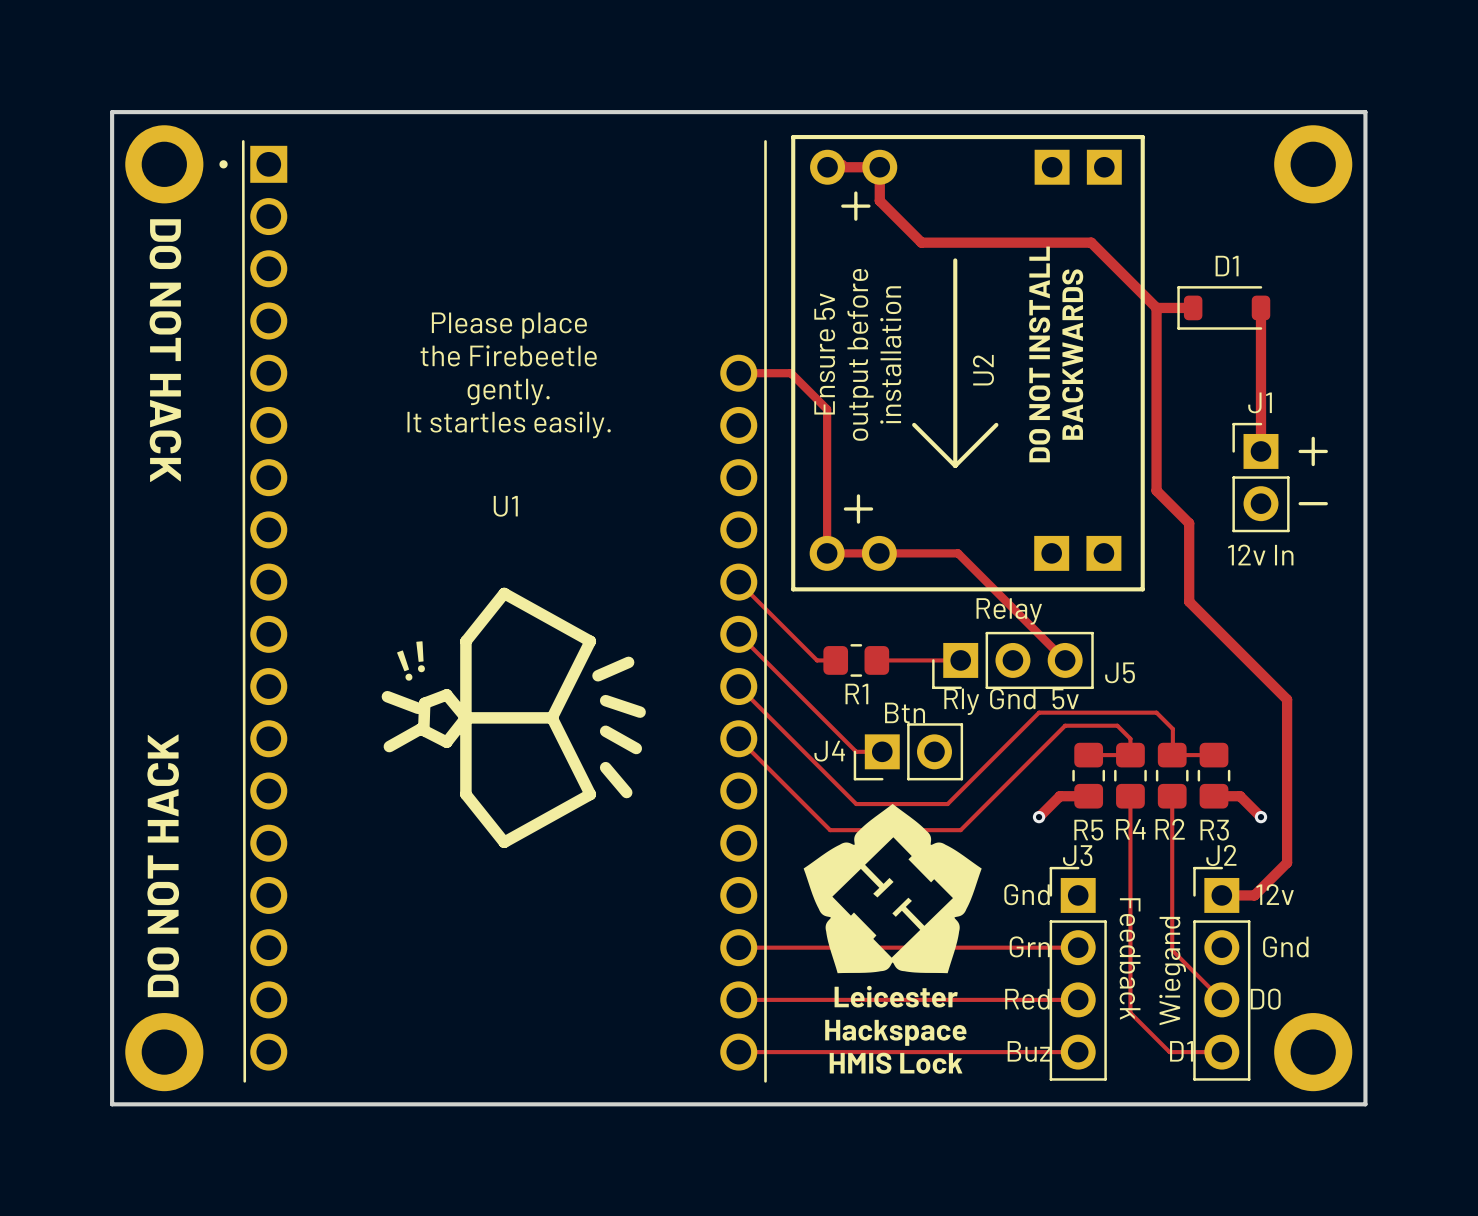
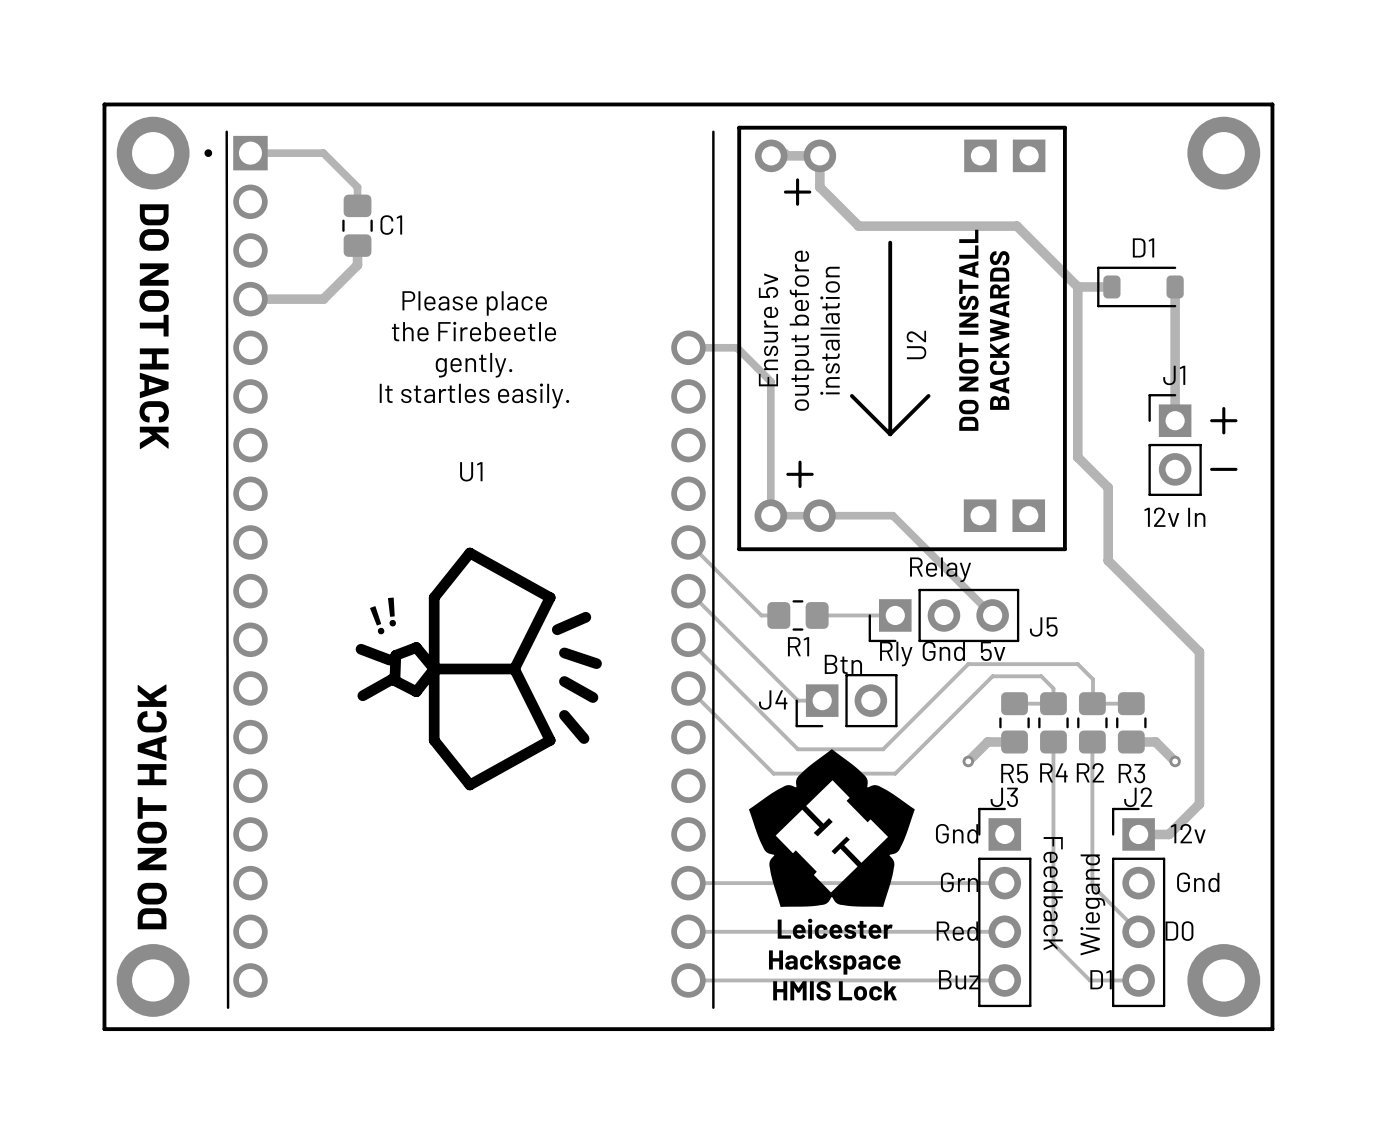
track: none -> (250, 153) (323, 153) (357, 187) (357, 205)
C1: none -> (357, 225)
track: none -> (357, 245) (357, 265) (323, 299) (250, 299)

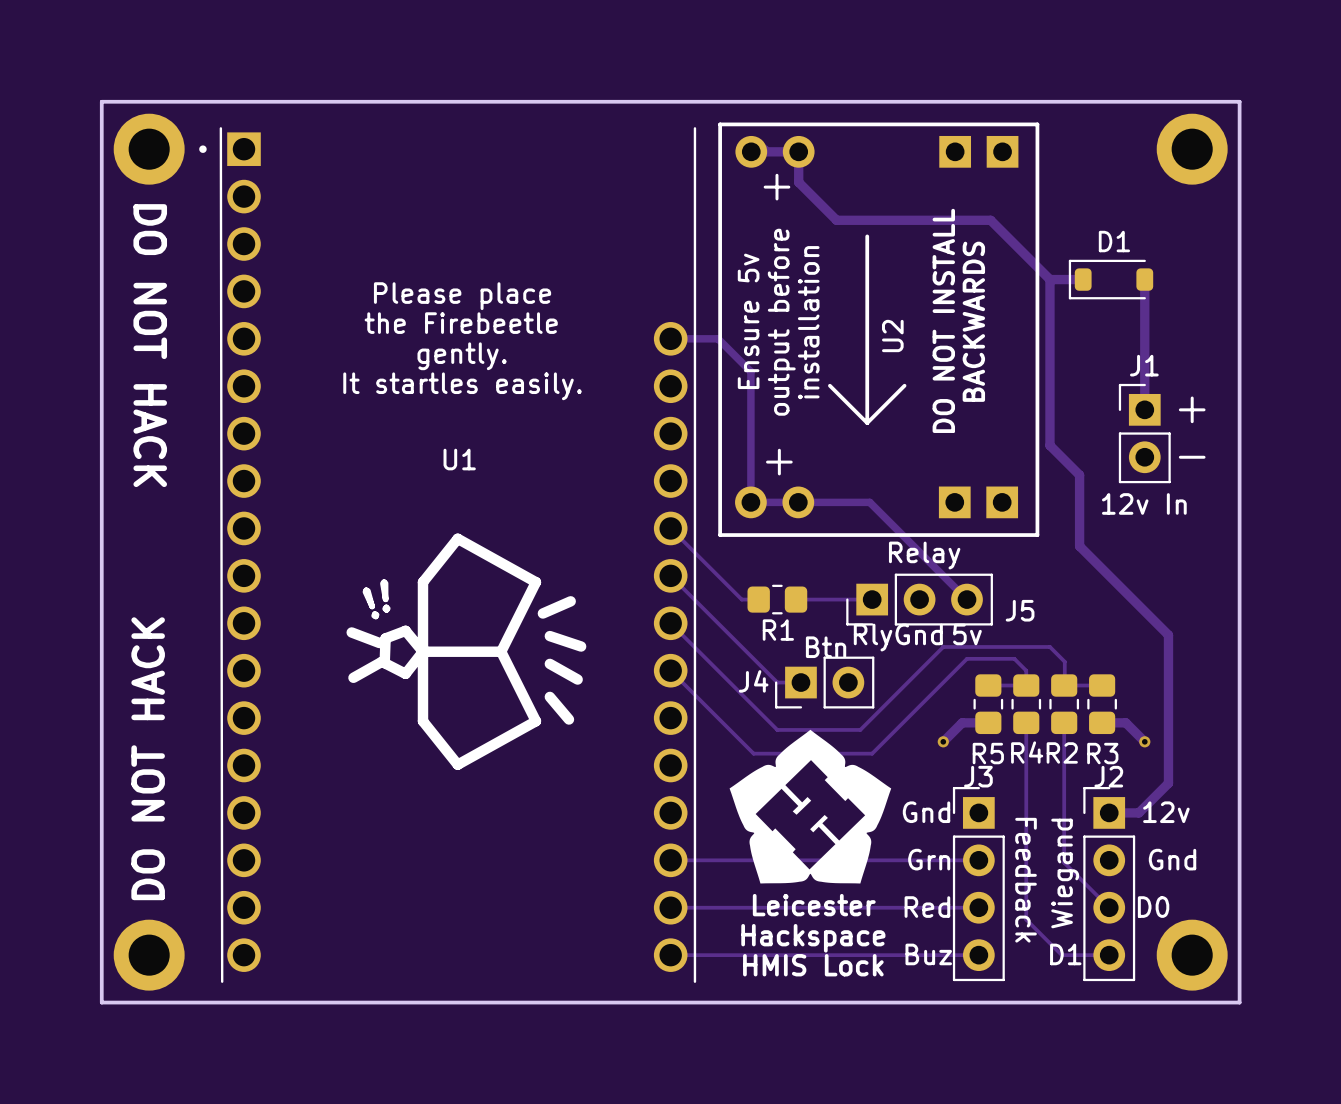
track: (250, 153) (323, 153) (357, 187) (357, 205) -> none
C1: (357, 225) -> none
track: (357, 245) (357, 265) (323, 299) (250, 299) -> none

